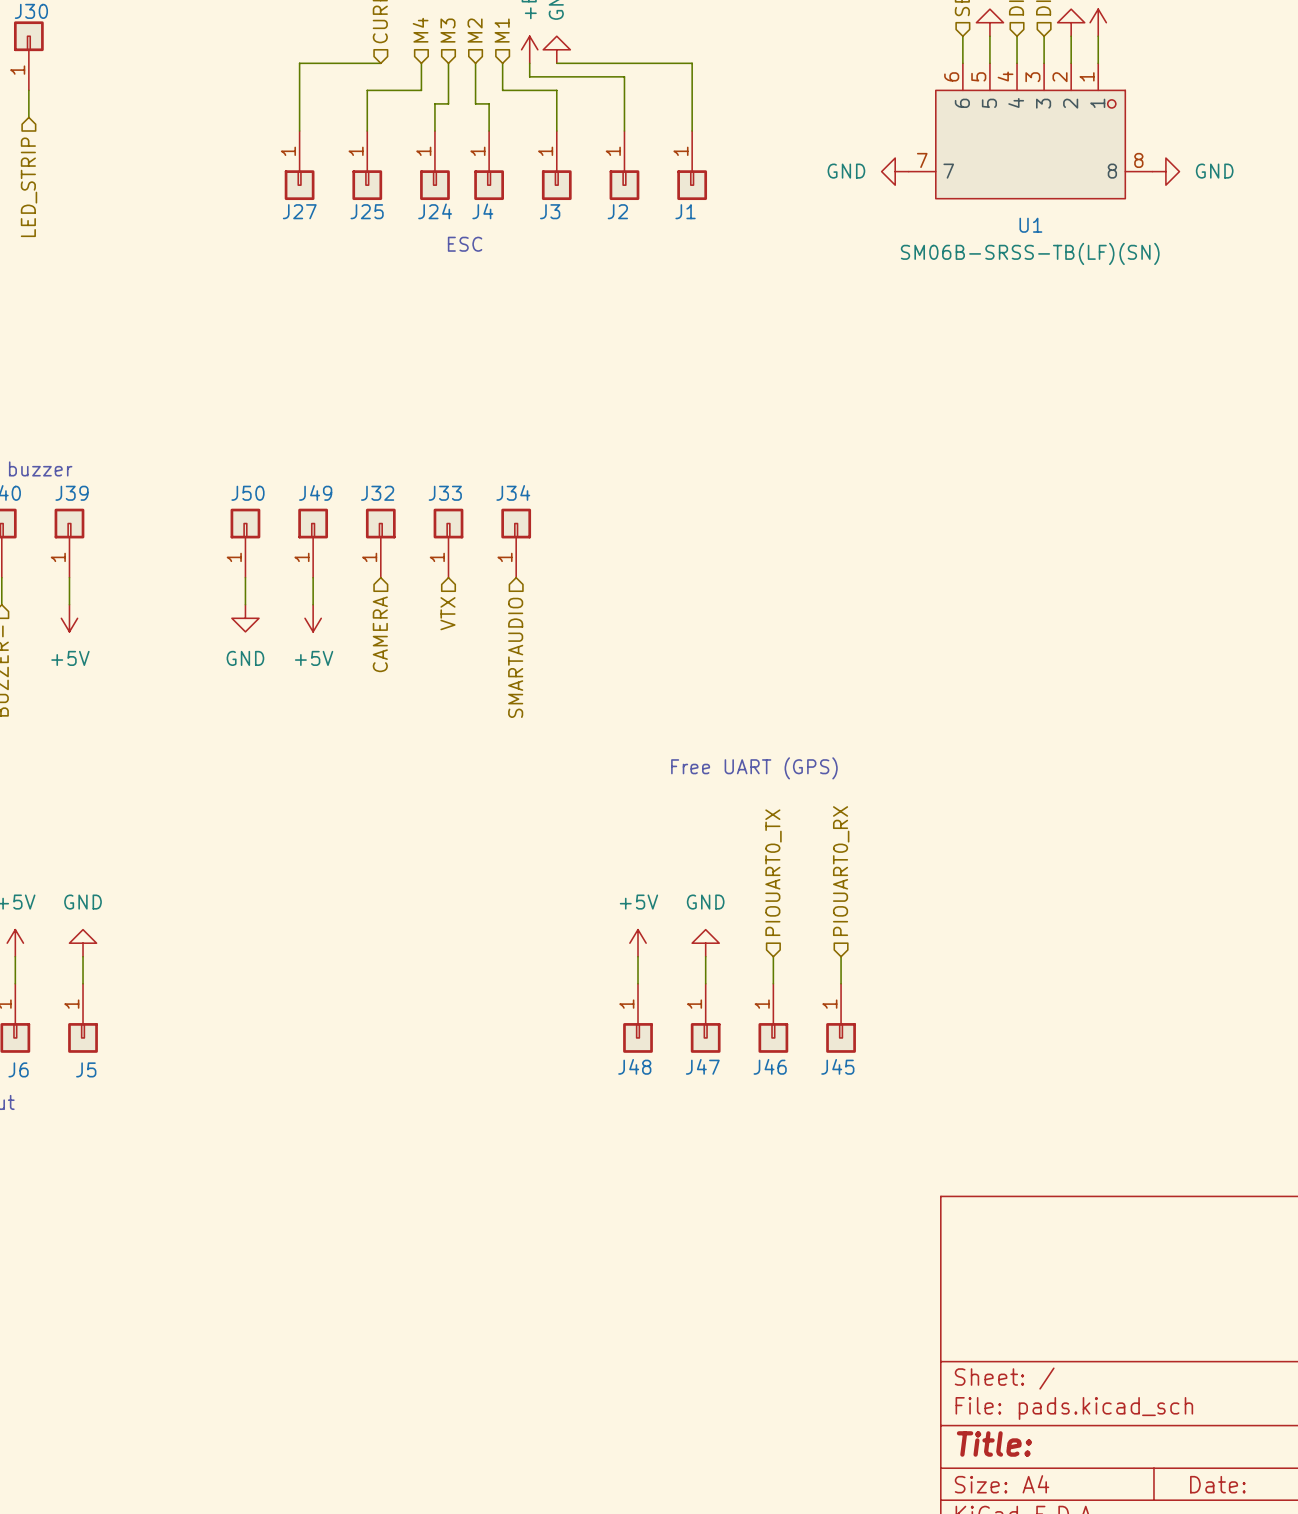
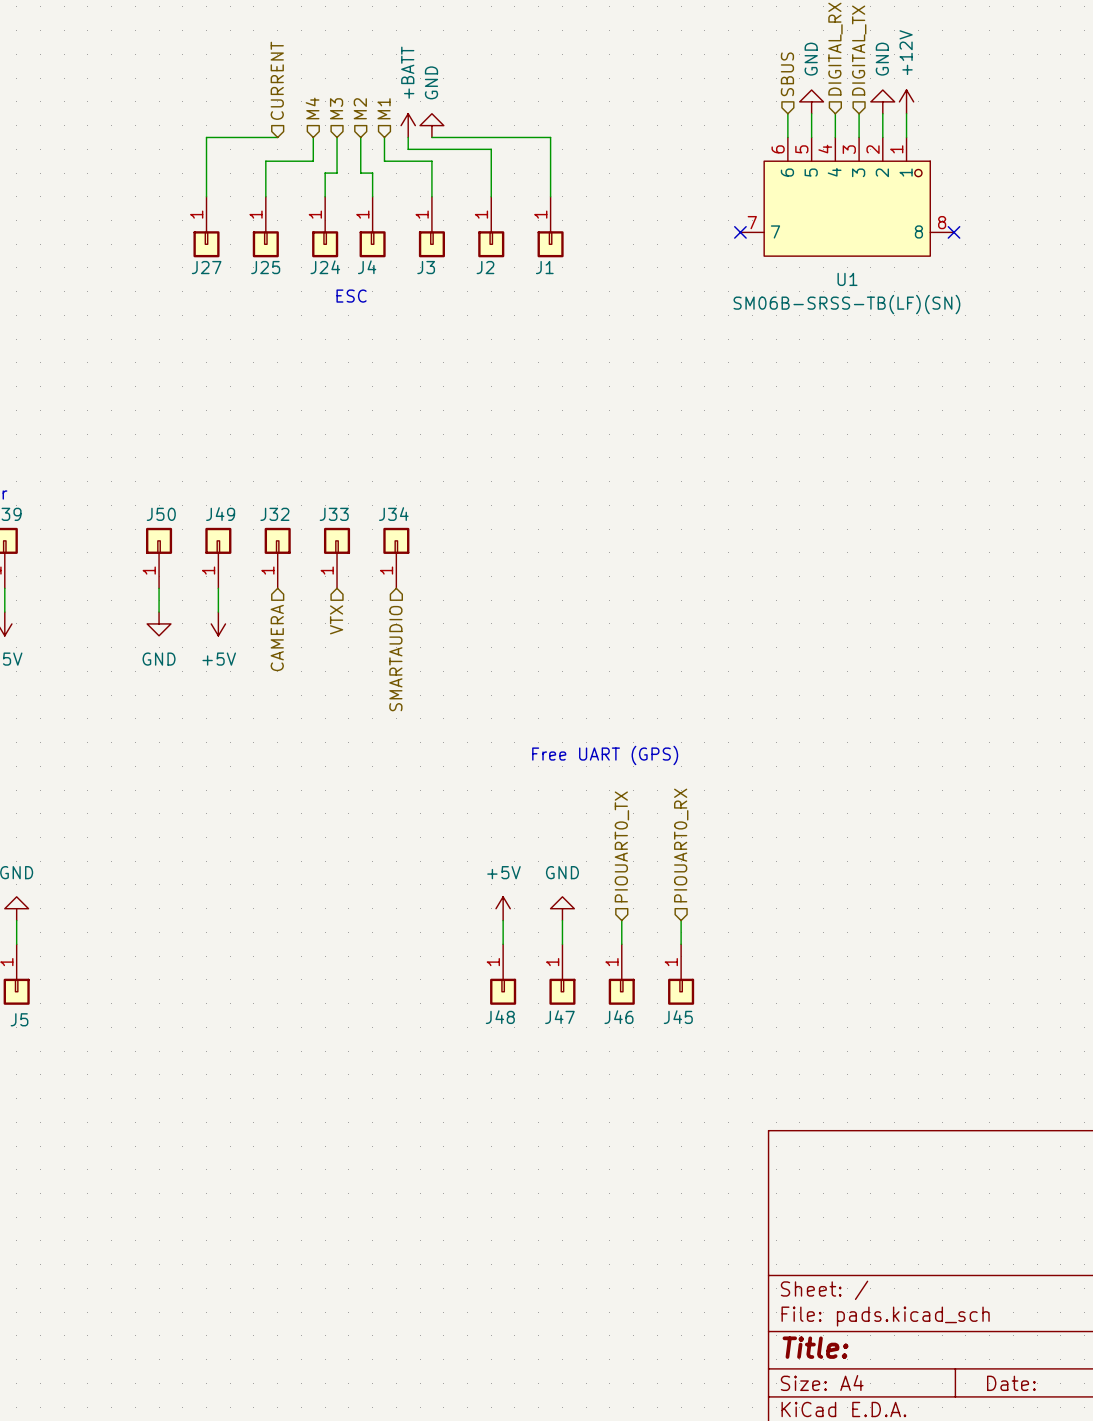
power symbol: GND (895, 171) -> none
no-connect mark: none -> (740, 232)
no-connect mark: none -> (954, 232)
power symbol: GND (1165, 171) -> none

